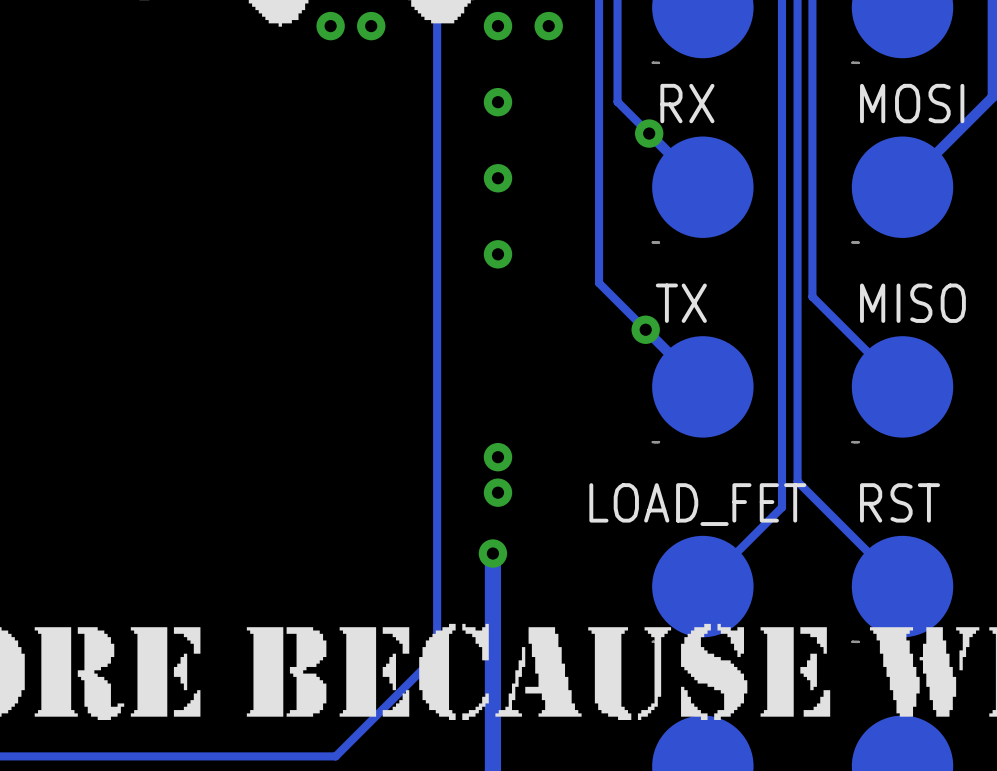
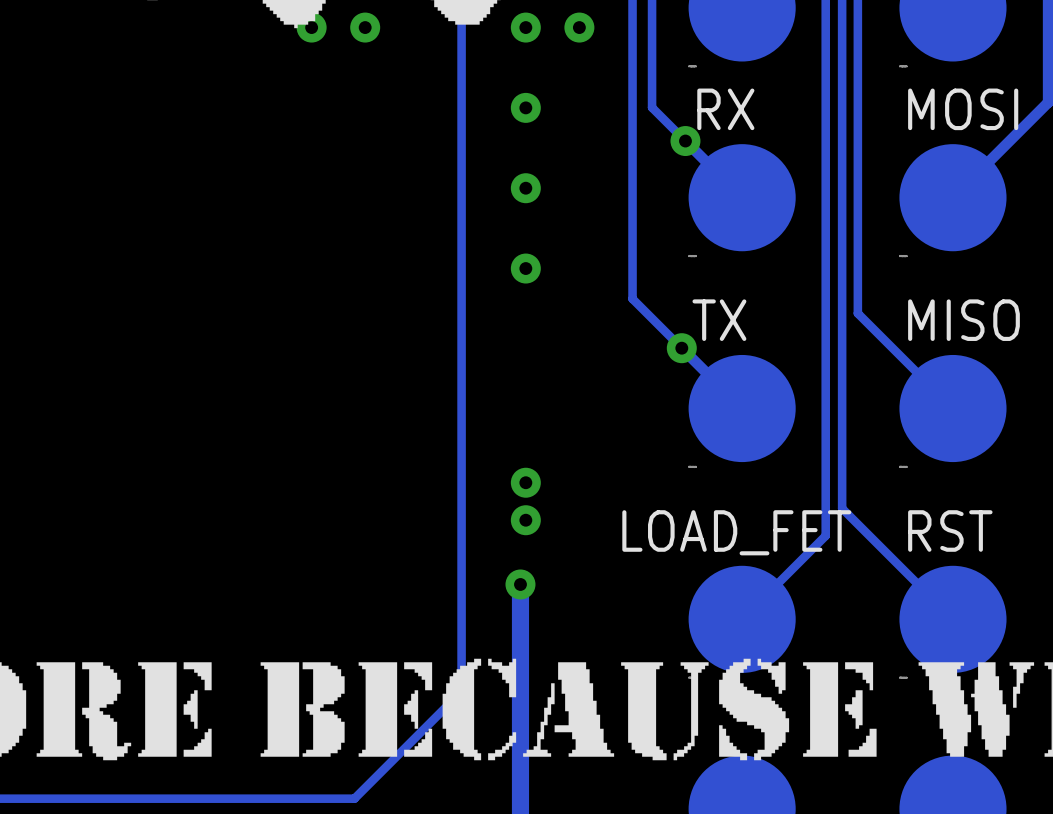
via: none -> (311, 27)
via: (330, 26) -> none
via: none -> (365, 27)
via: (371, 26) -> none

